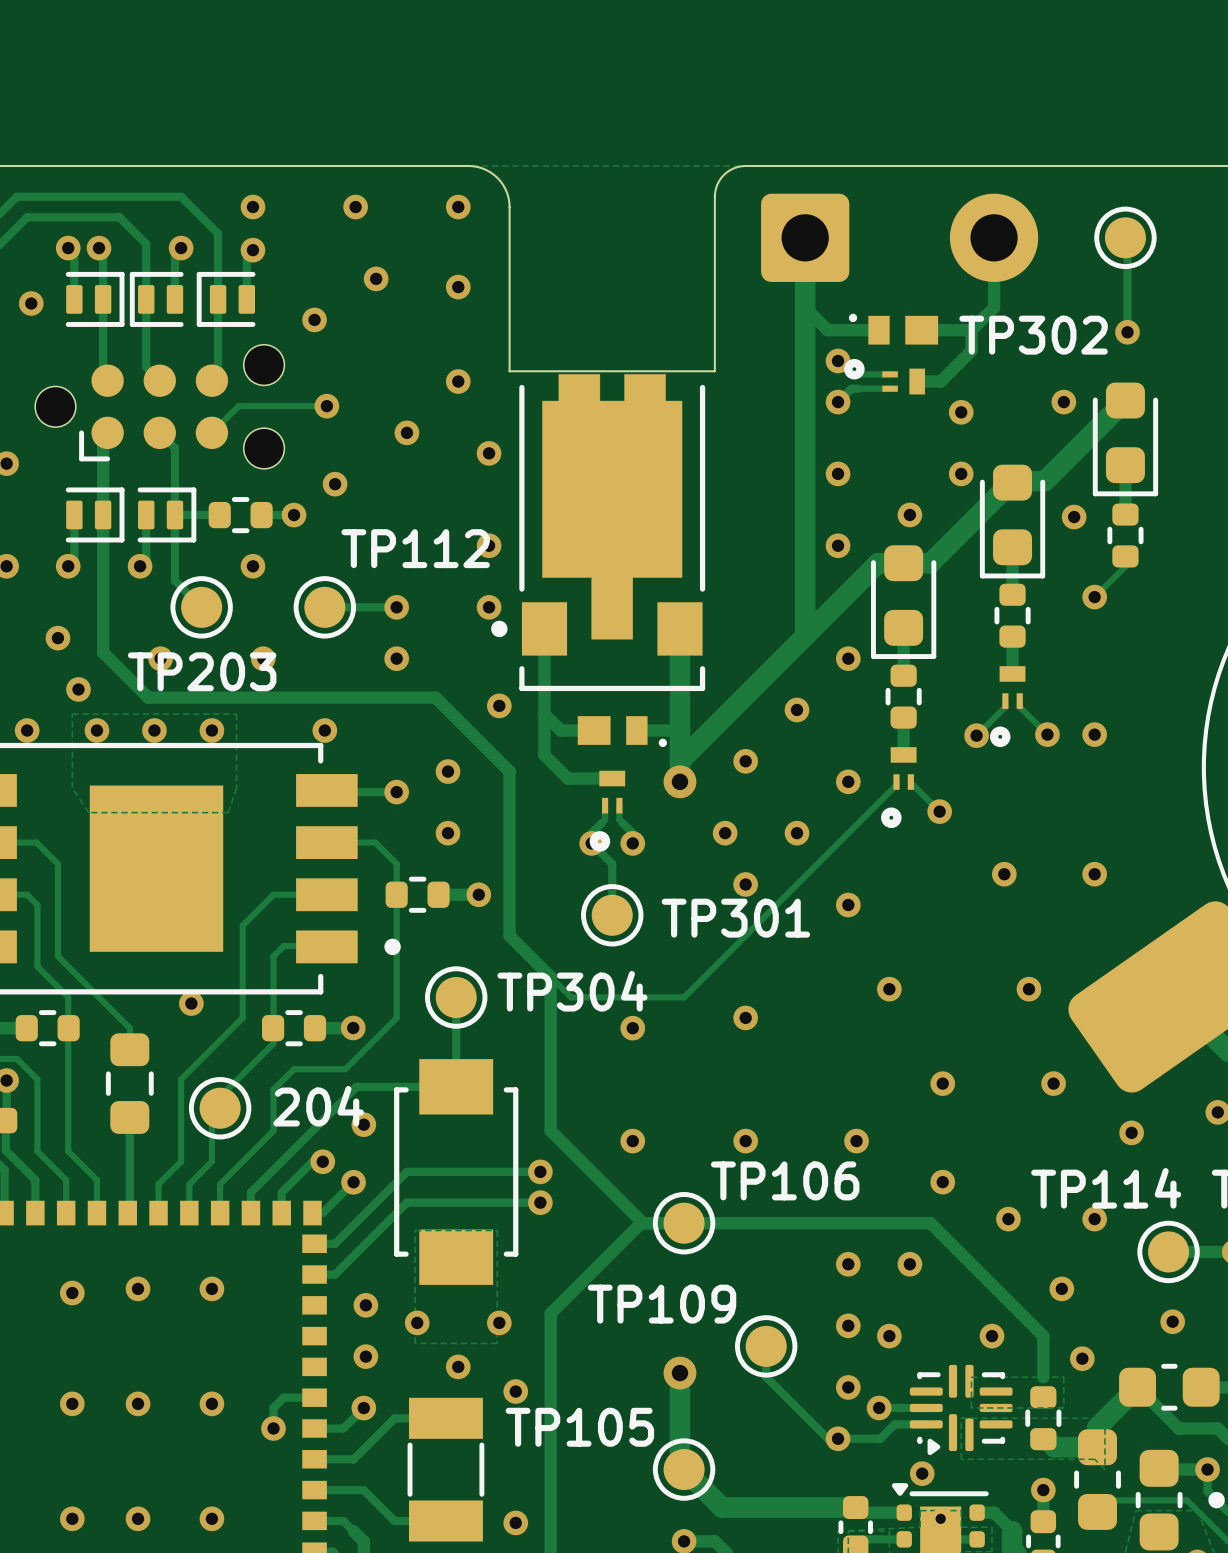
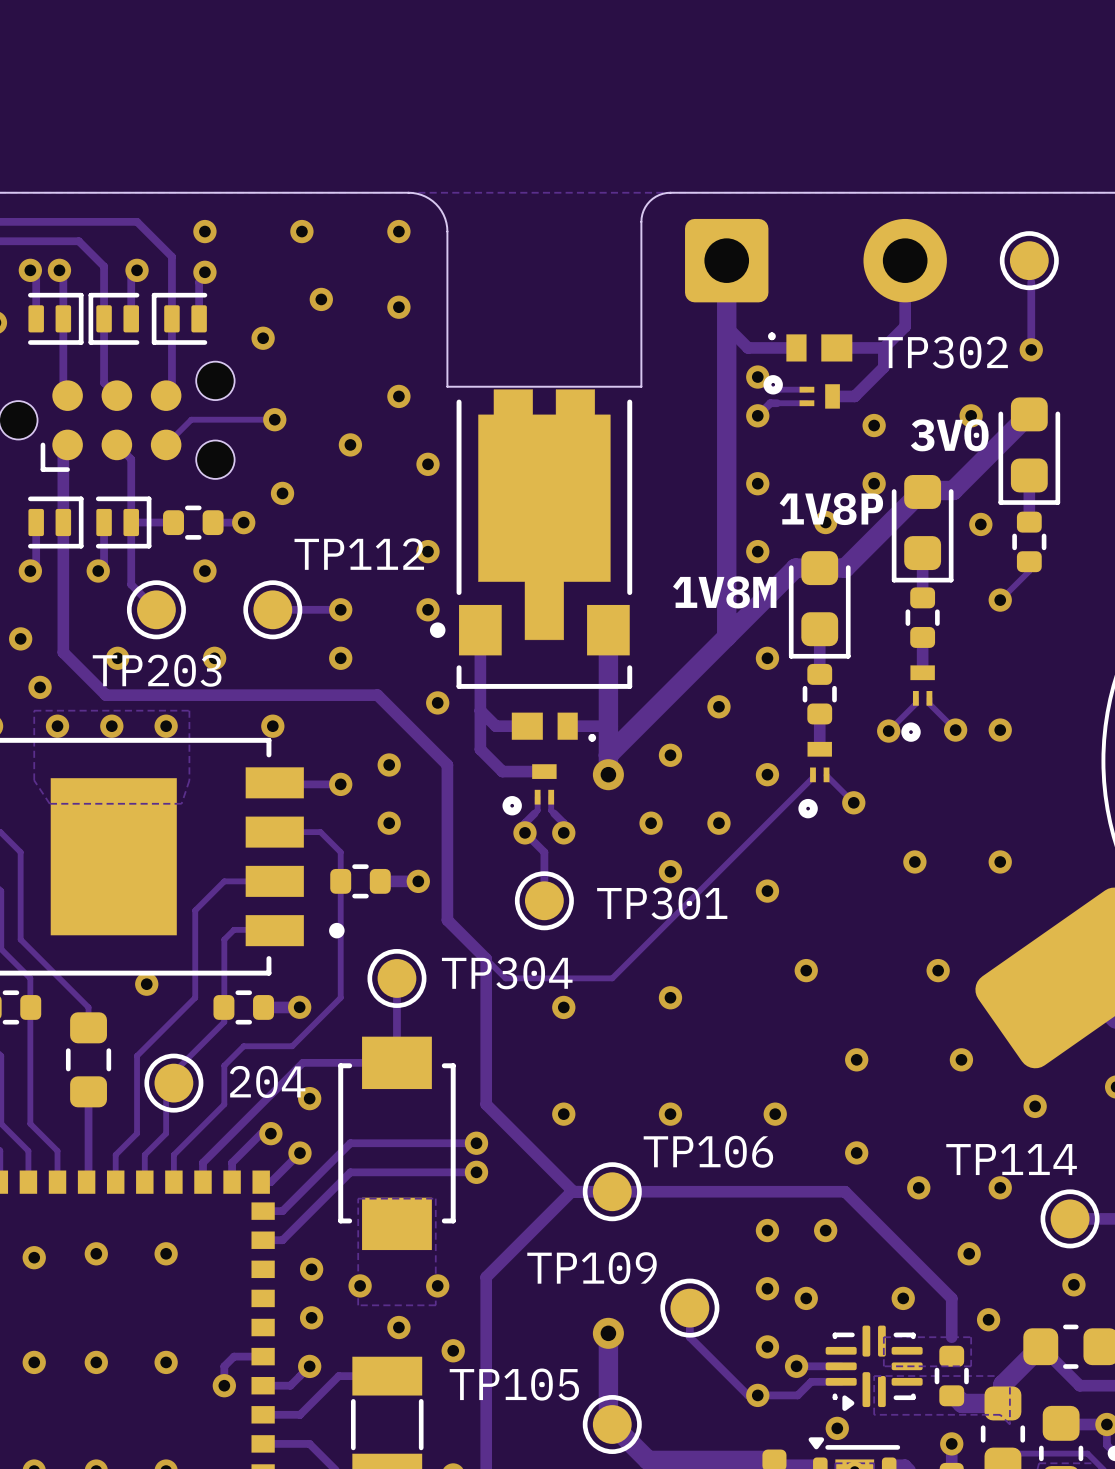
text: none -> 3V0 (949, 435)
text: none -> 1V8P (831, 509)
text: none -> 1V8M (724, 592)
part footprint: [589, 770, 626, 852] -> [502, 764, 557, 816]

